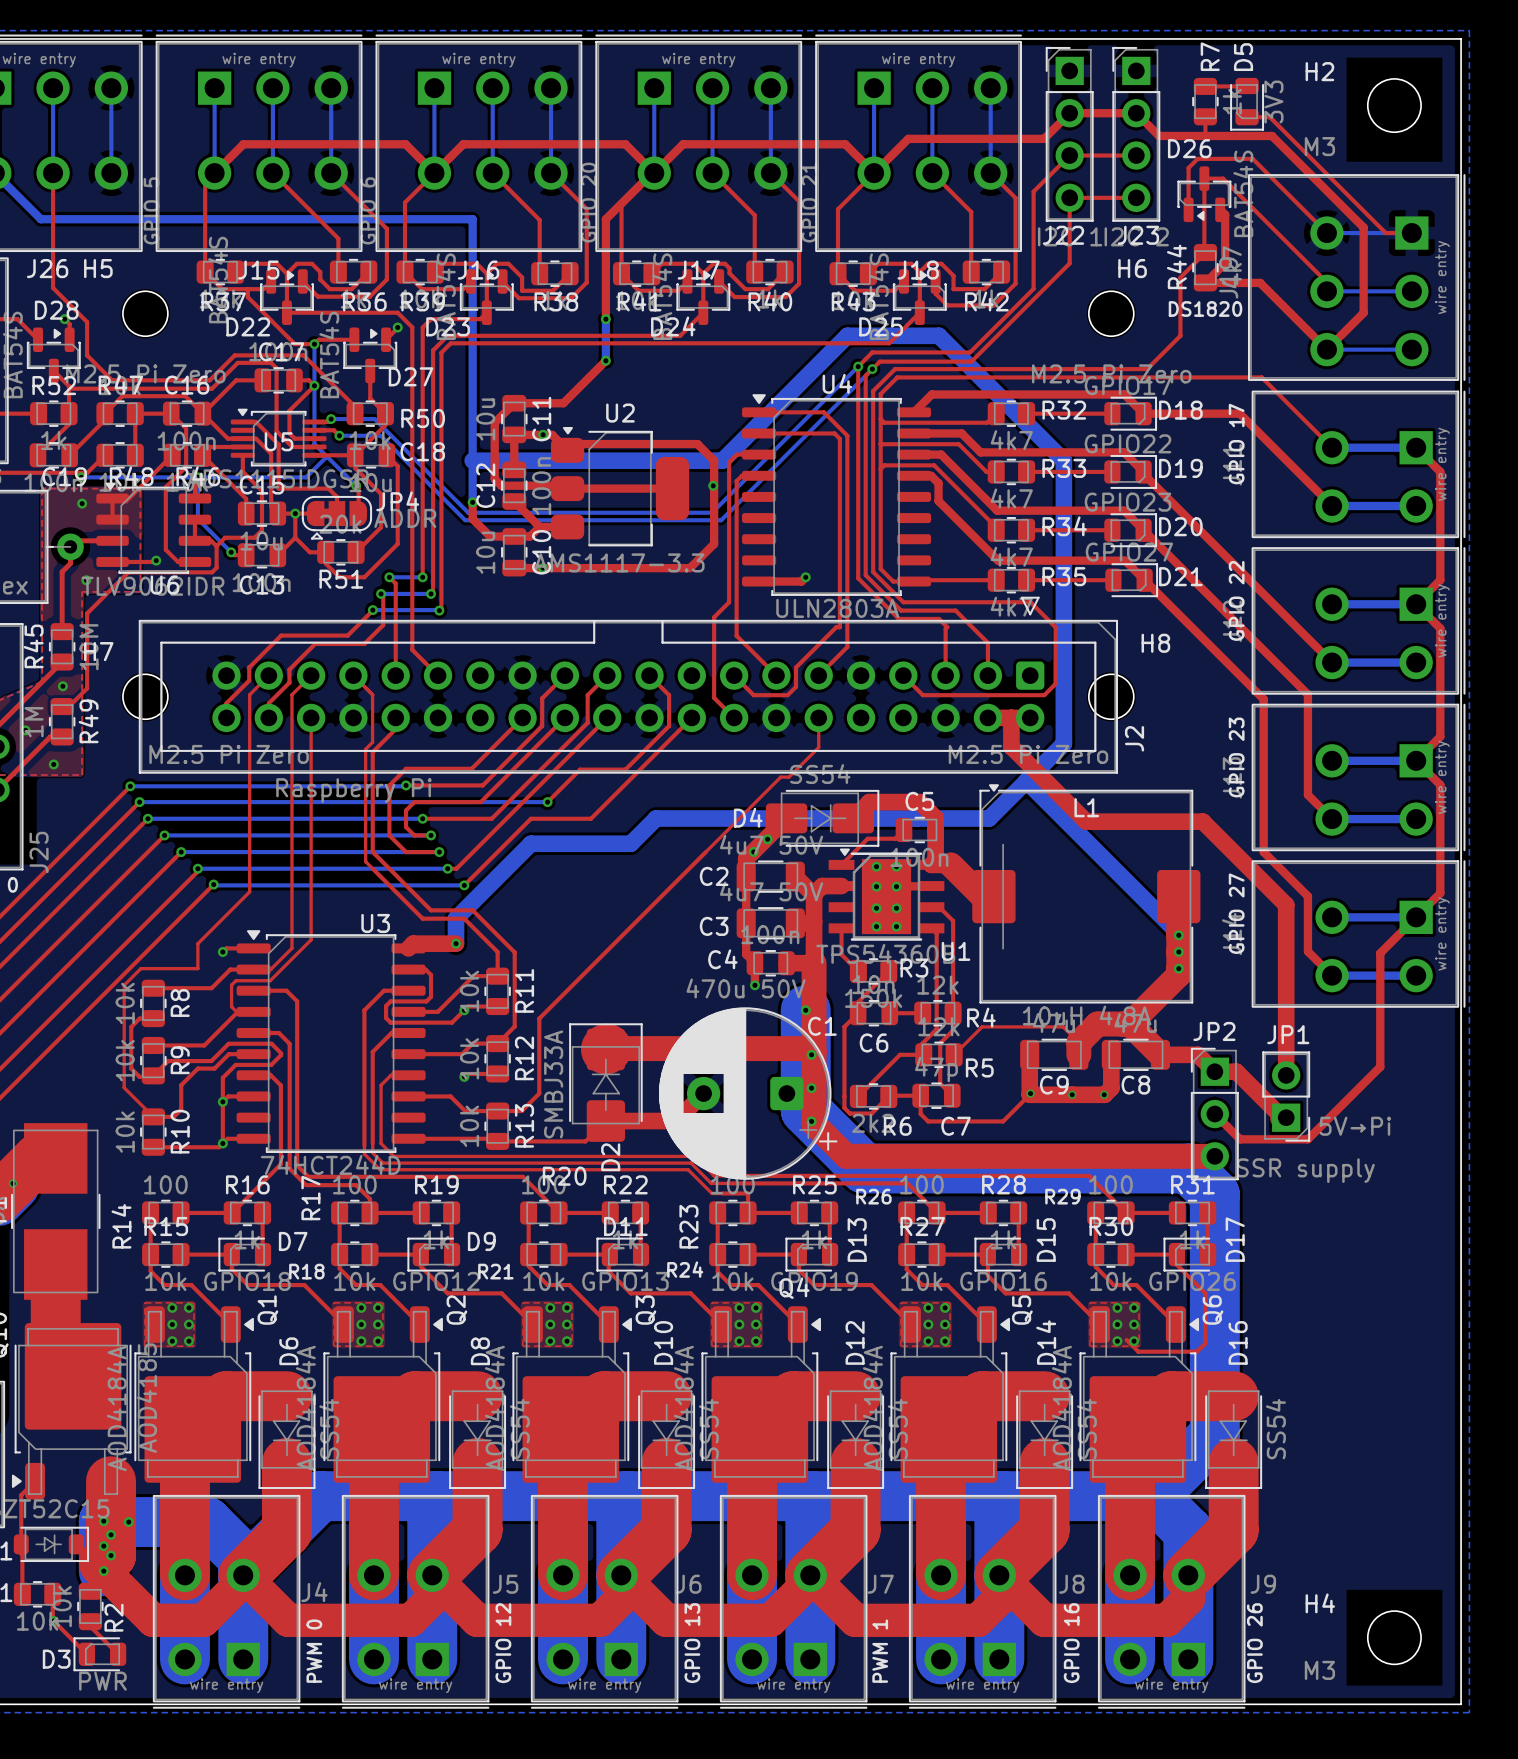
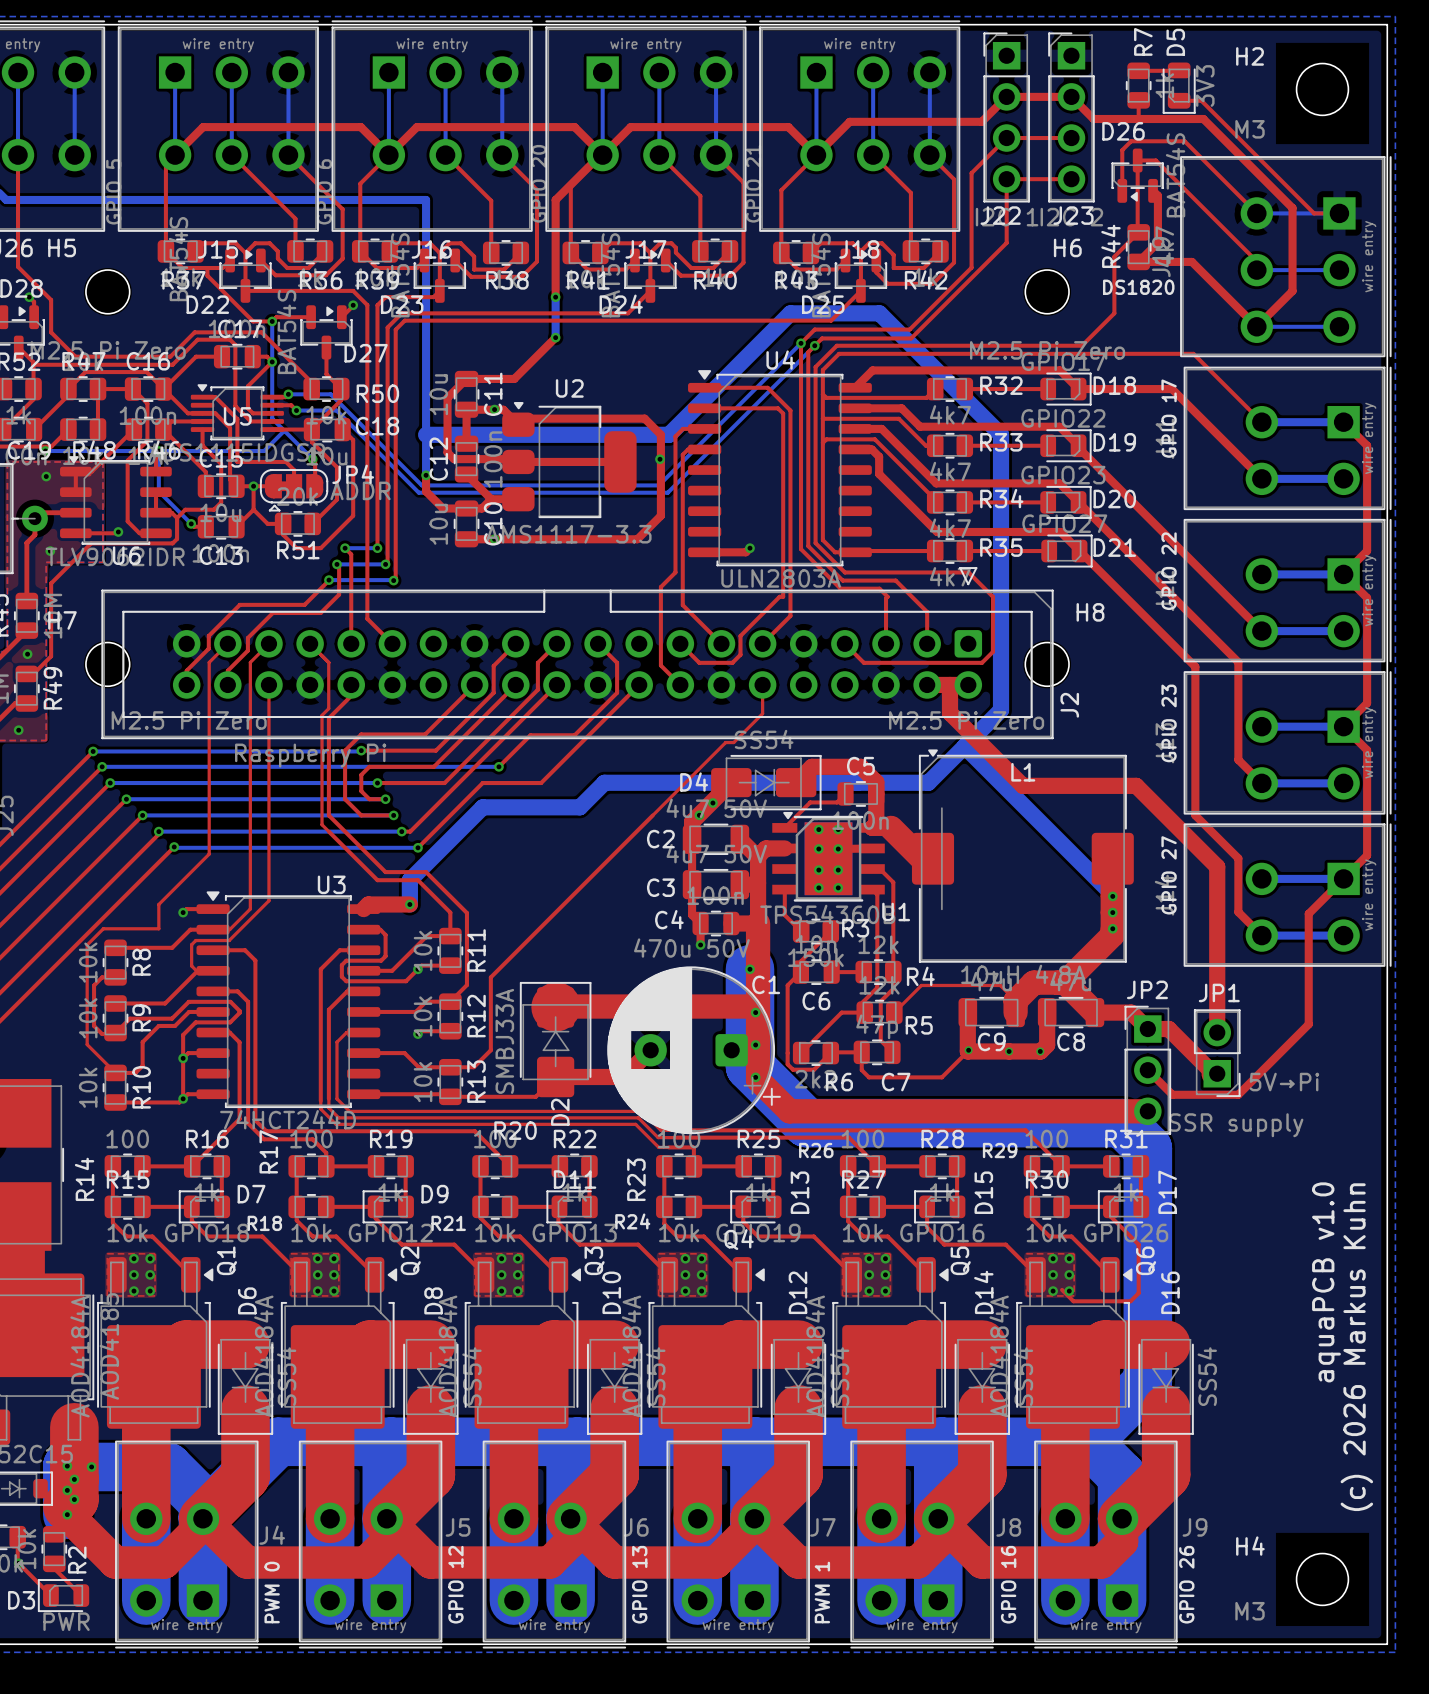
text: none -> aquaPCB v1.0 (1326, 1282)
text: none -> (c) 2026 Markus Kuhn (1356, 1347)

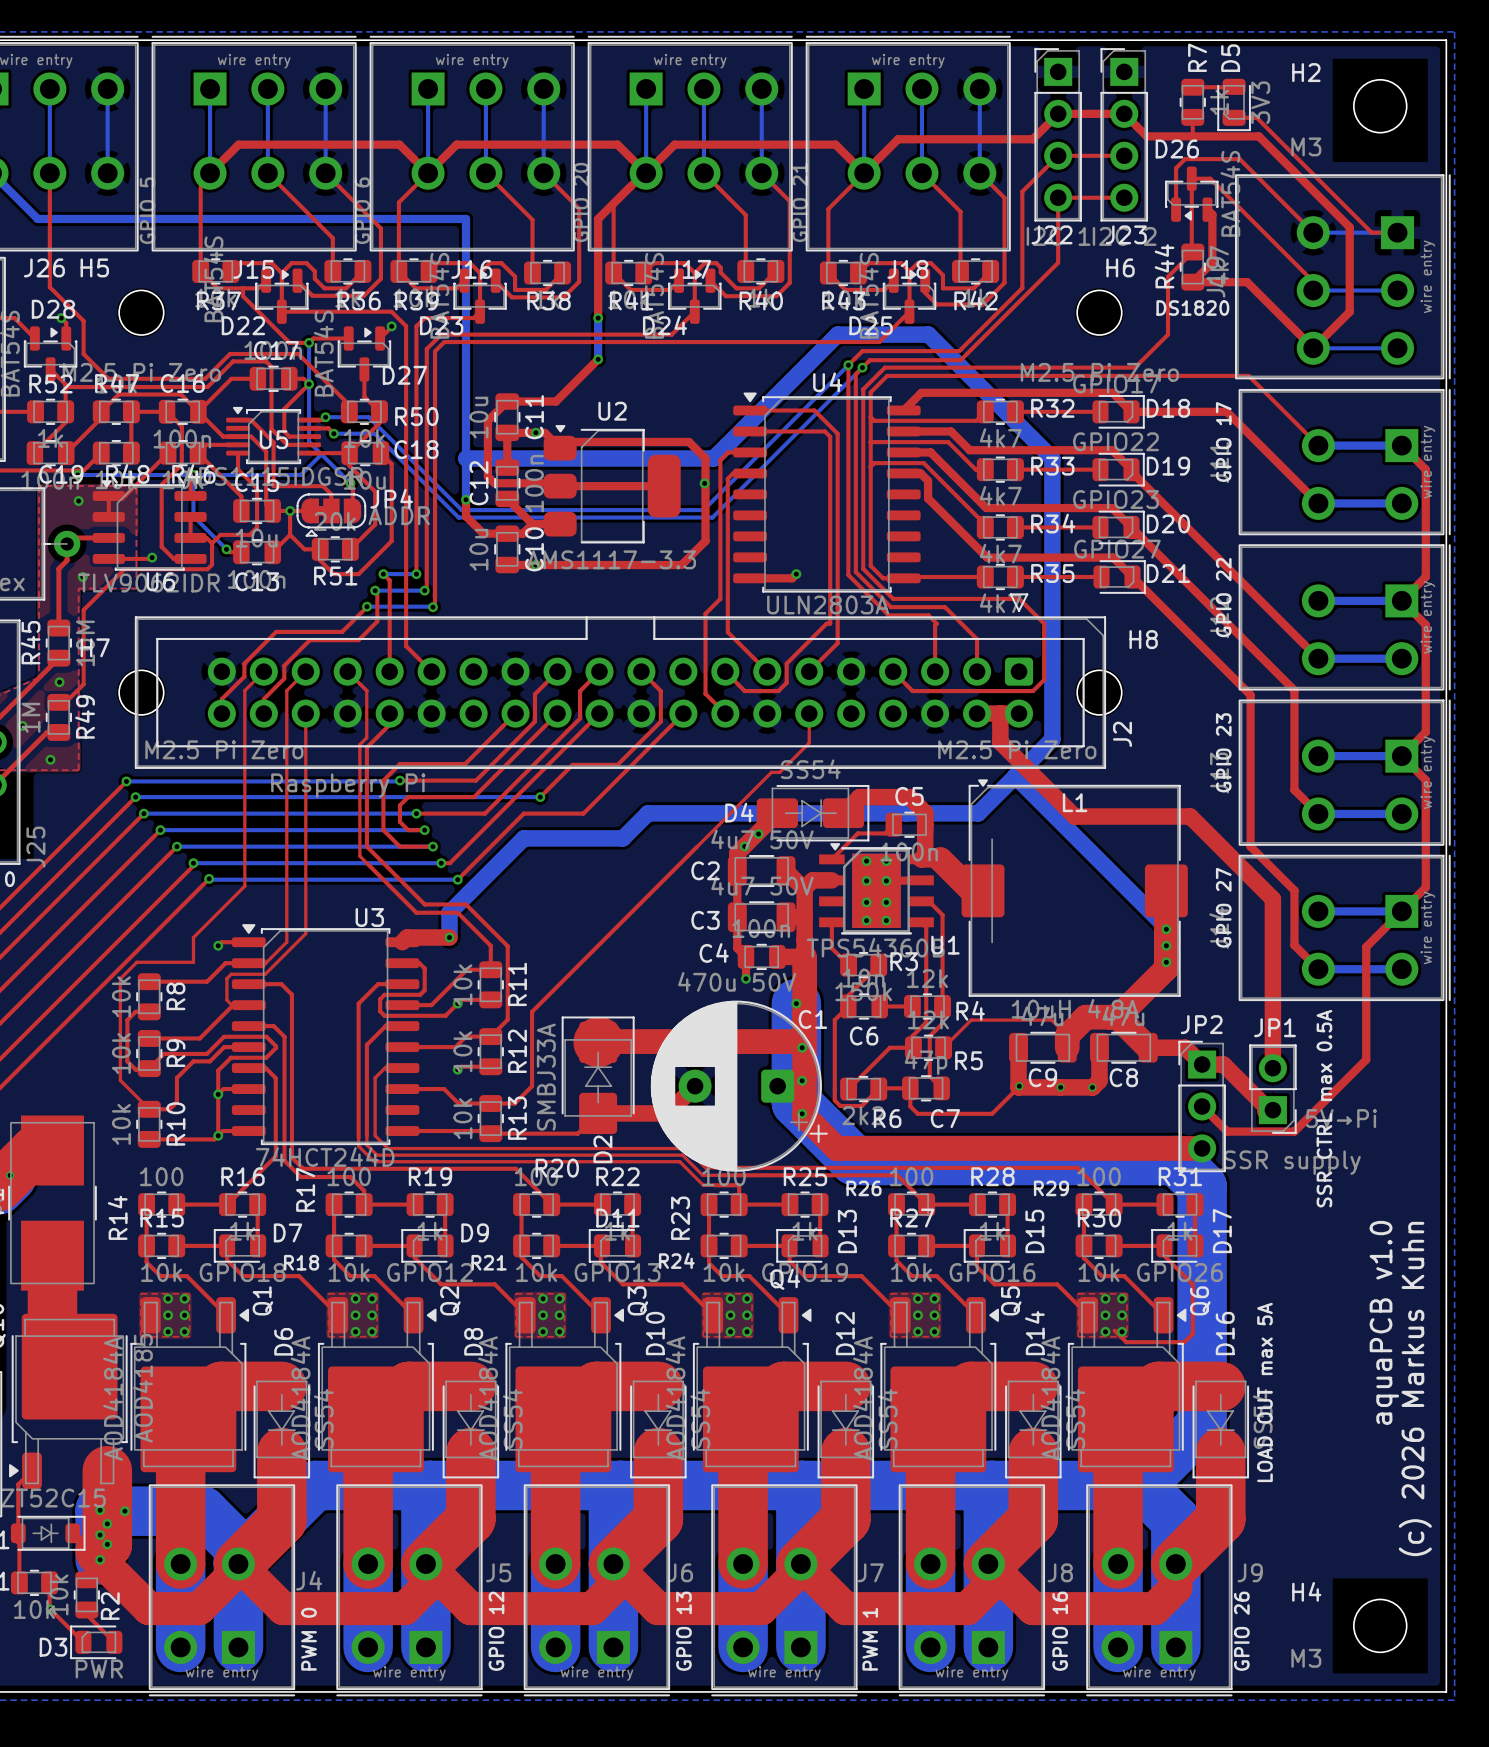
text: none -> SSR CTRL max 0.5A (1324, 1108)
text: none -> LOAD OUT max 5A (1264, 1392)

